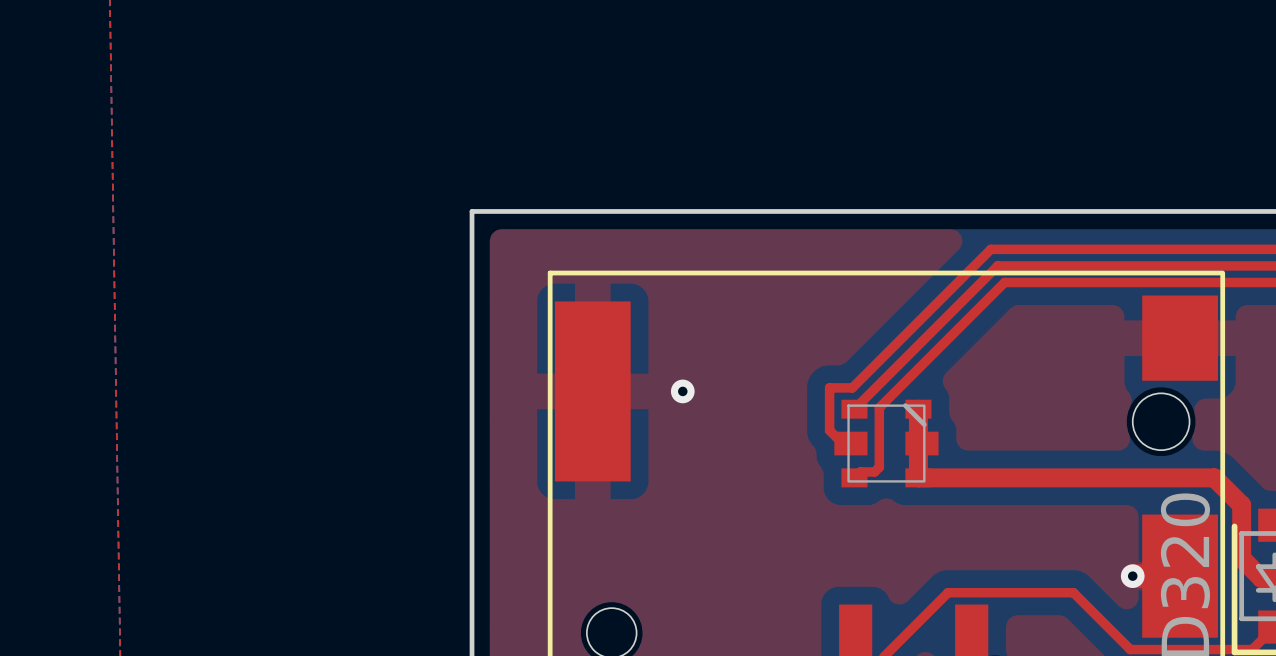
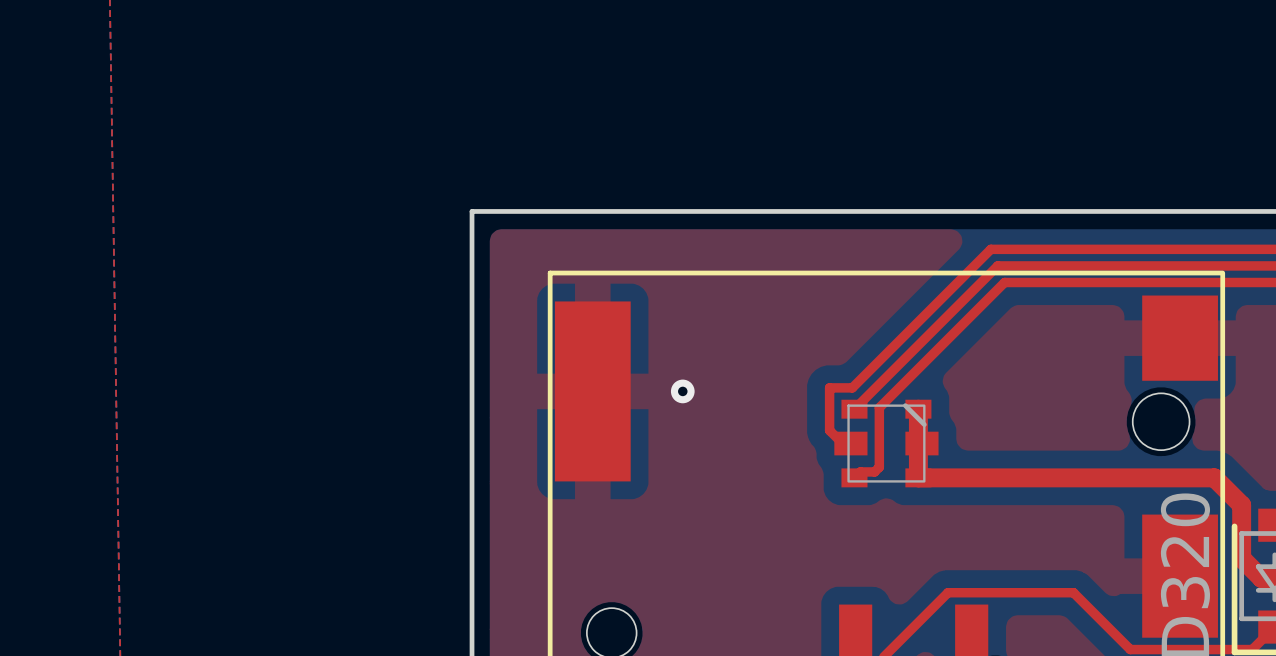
via: (1132, 576) -> none

